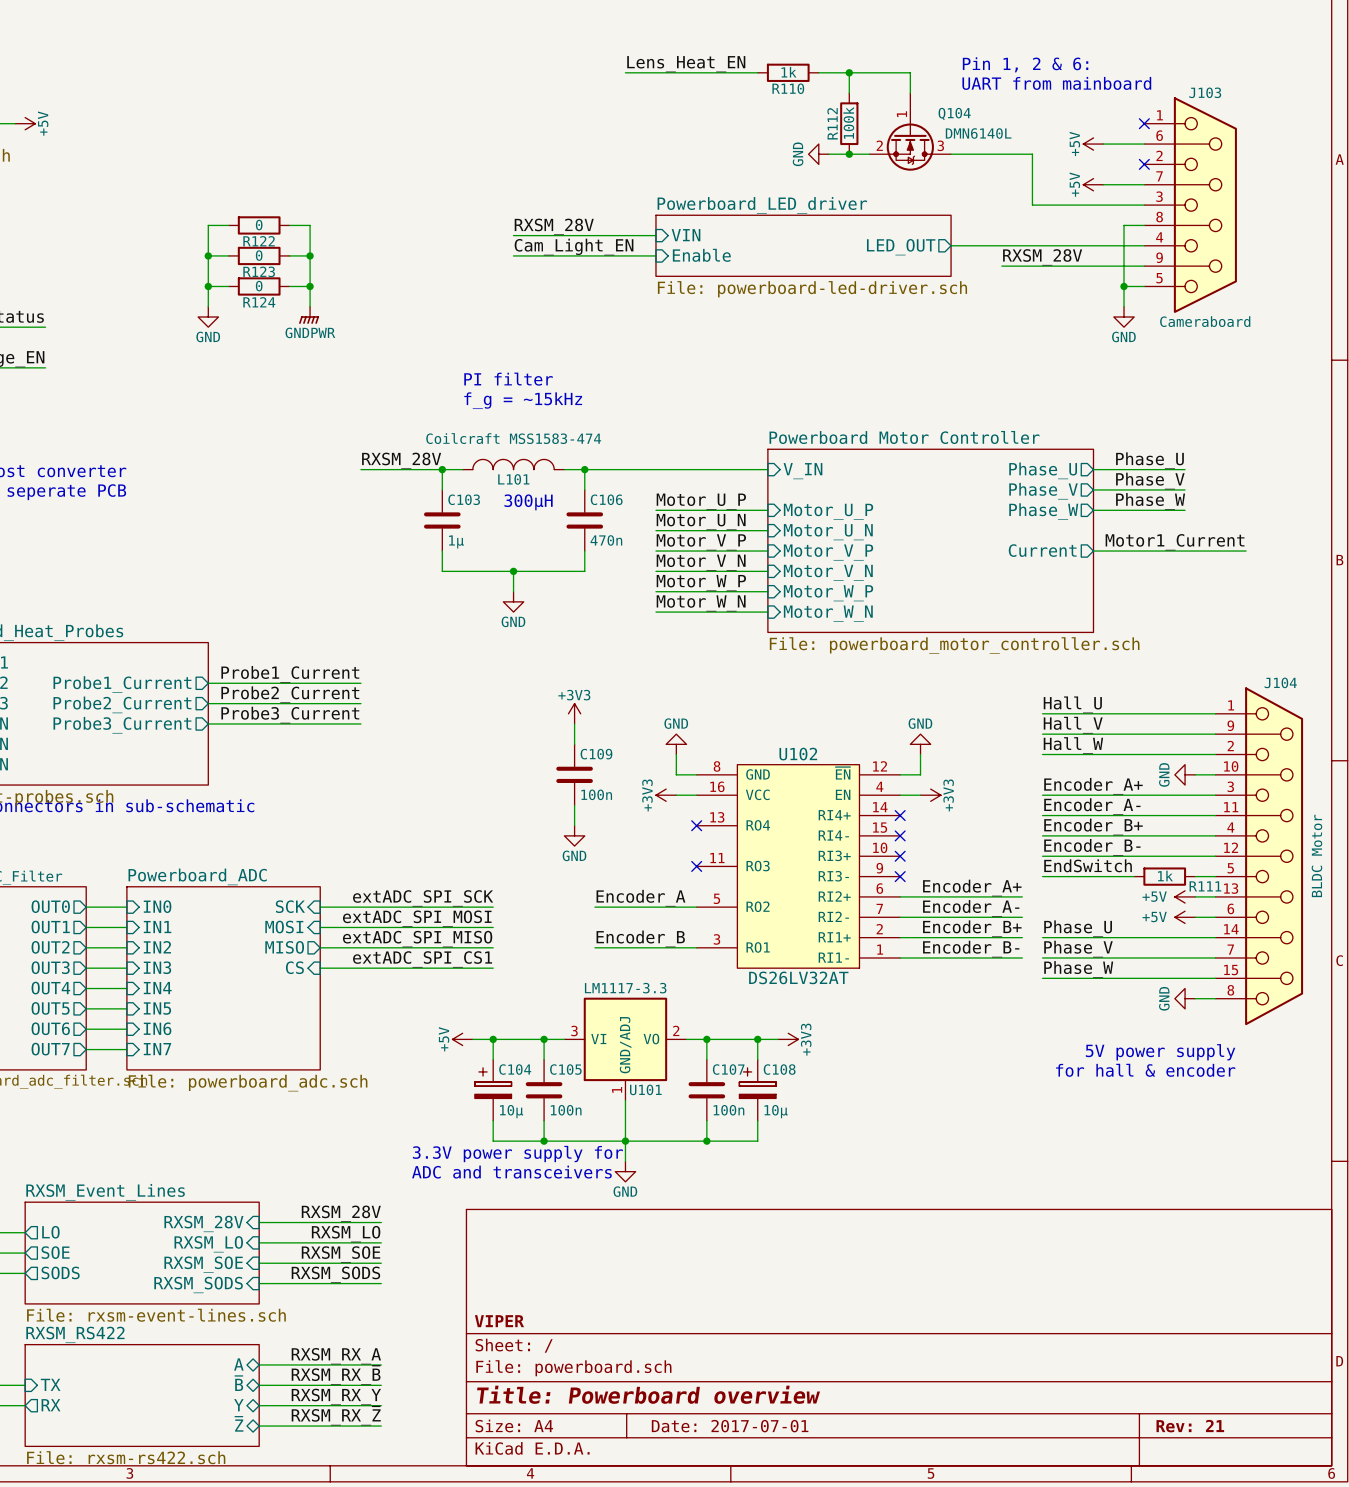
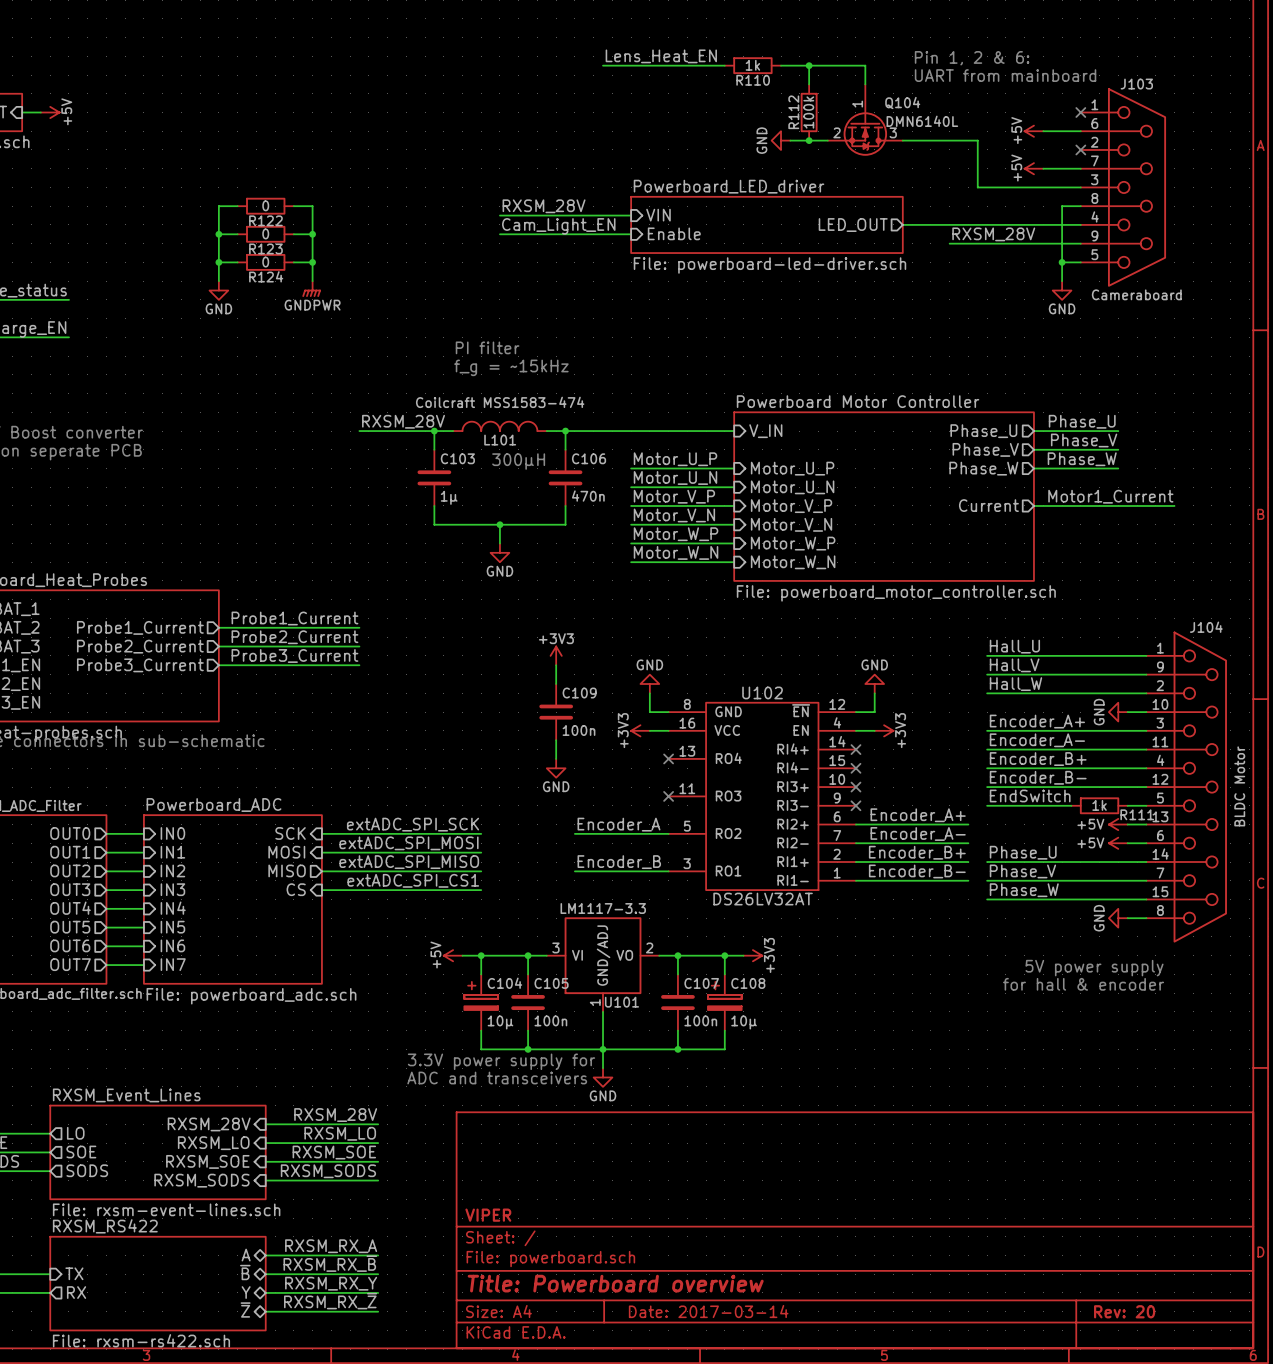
title block: Date: 2017-07-01 (730, 1426) -> Date: 2017-03-14 (708, 1311)
title block: Rev: 21 (1190, 1426) -> Rev: 20 (1124, 1311)

